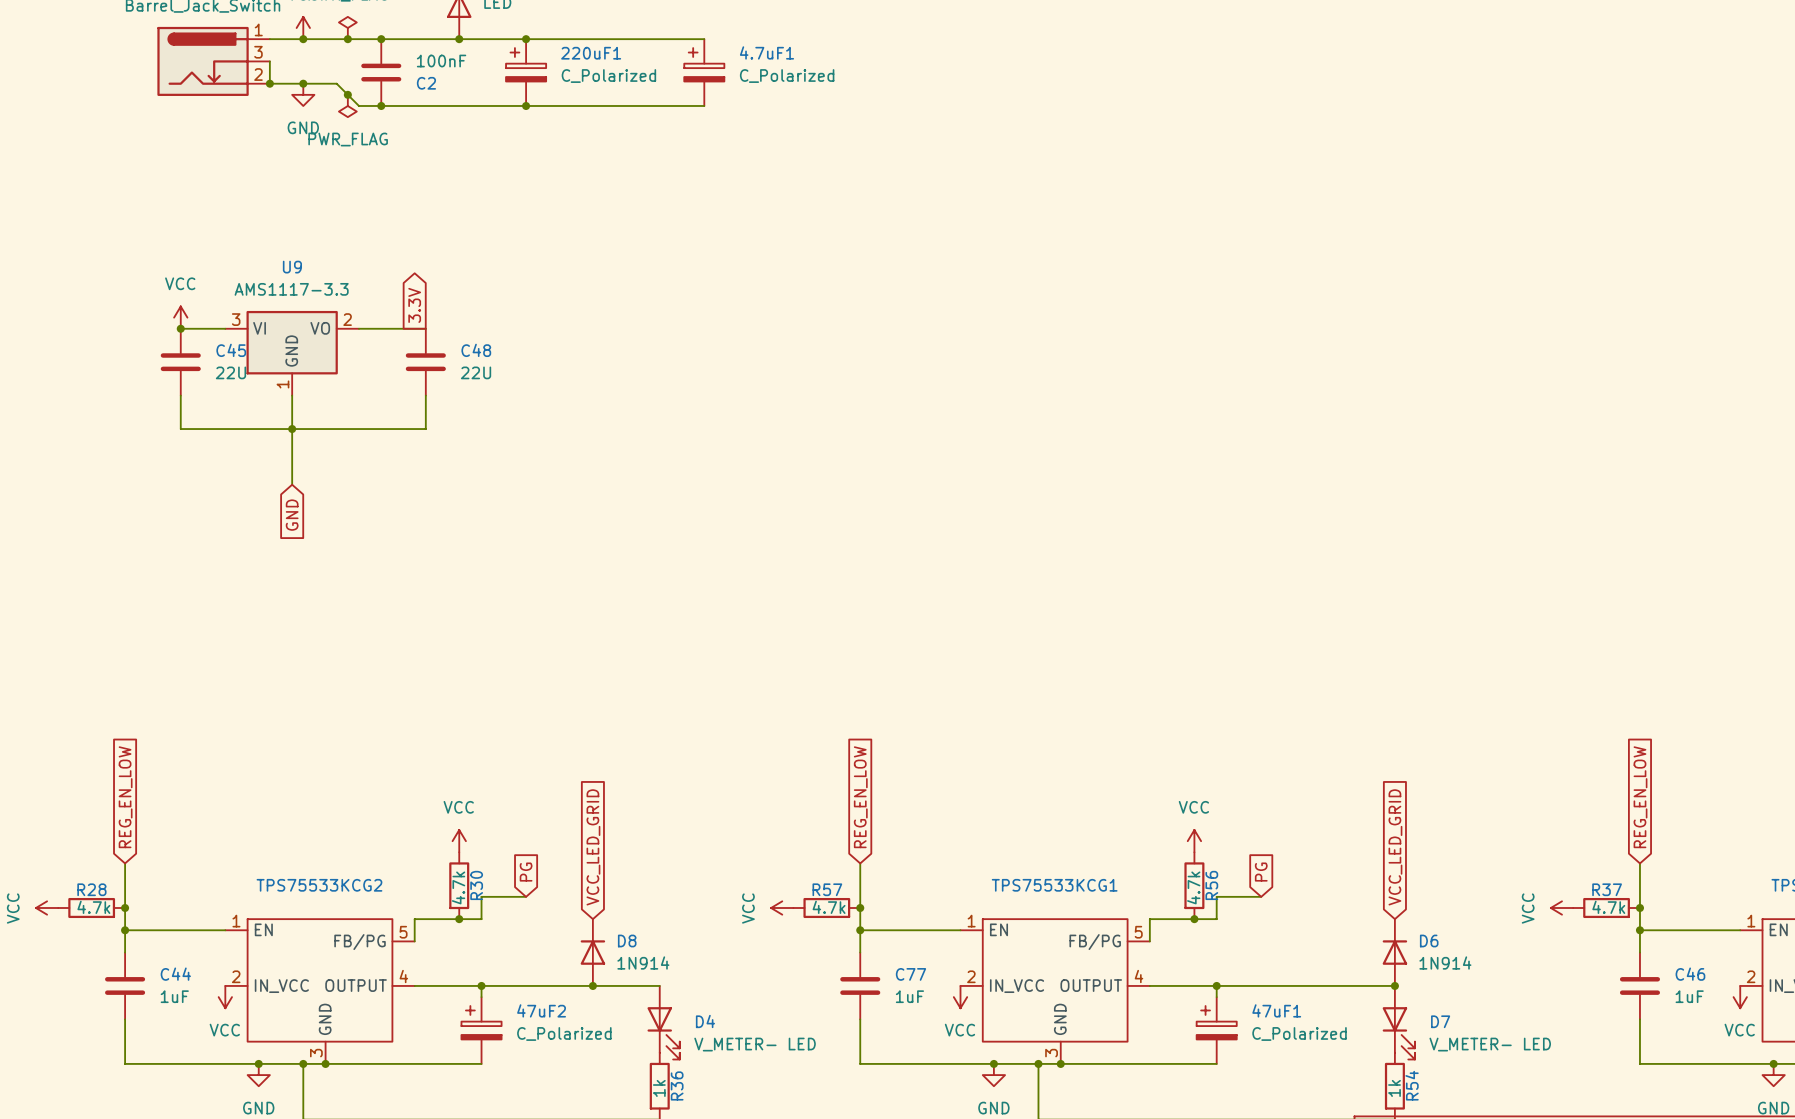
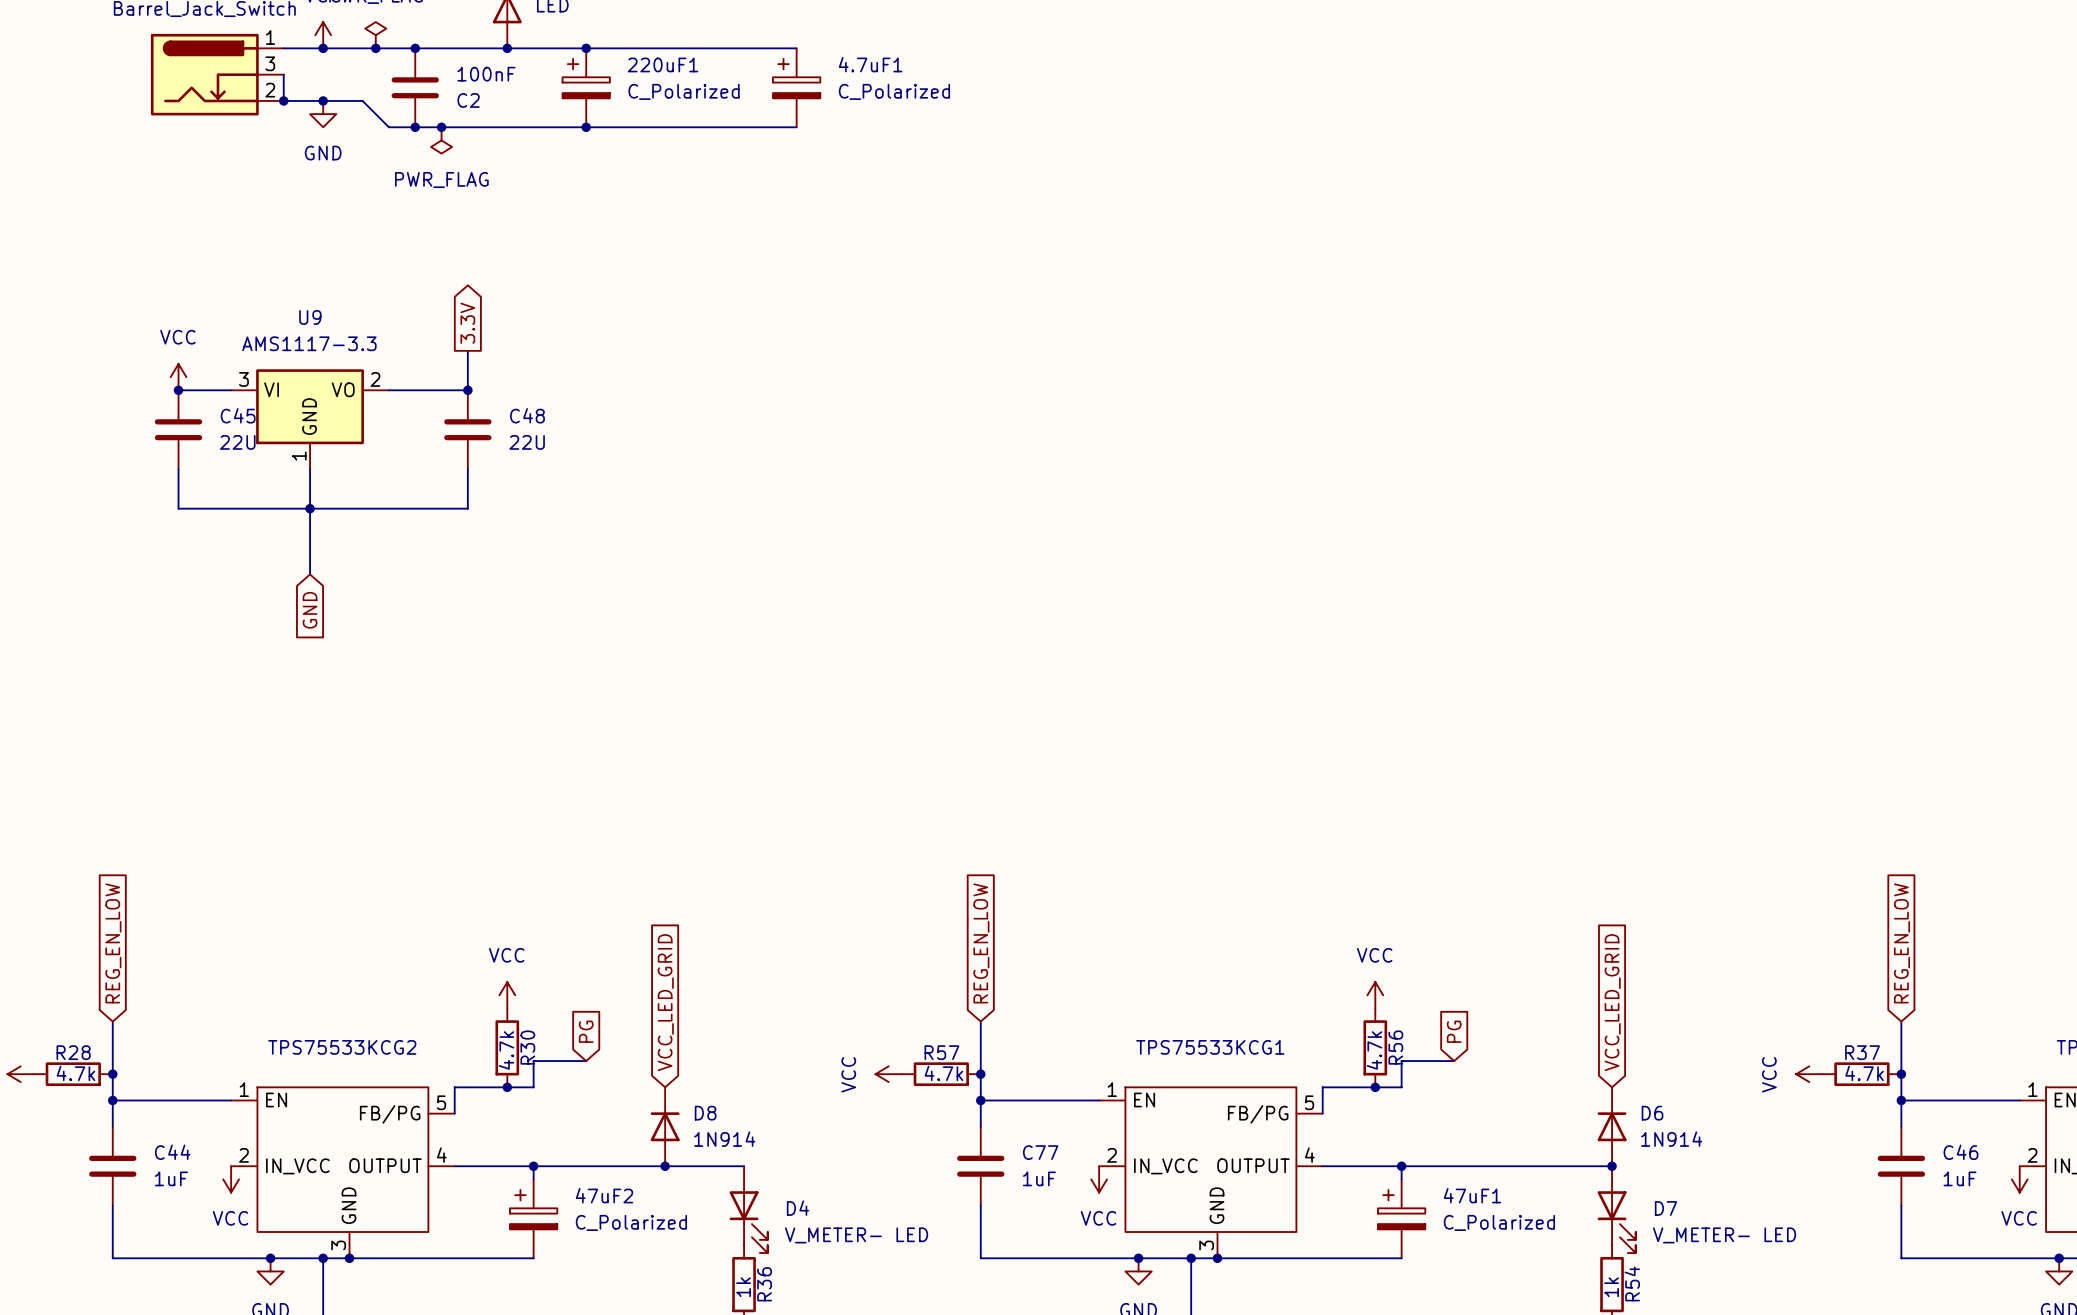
junction: (347, 94) -> none
power symbol position: PWR_FLAG (347, 105) -> PWR_FLAG (441, 140)
junction: none -> (441, 127)
global label position: 3.3V (414, 305) -> 3.3V (467, 323)
junction: none -> (467, 390)

